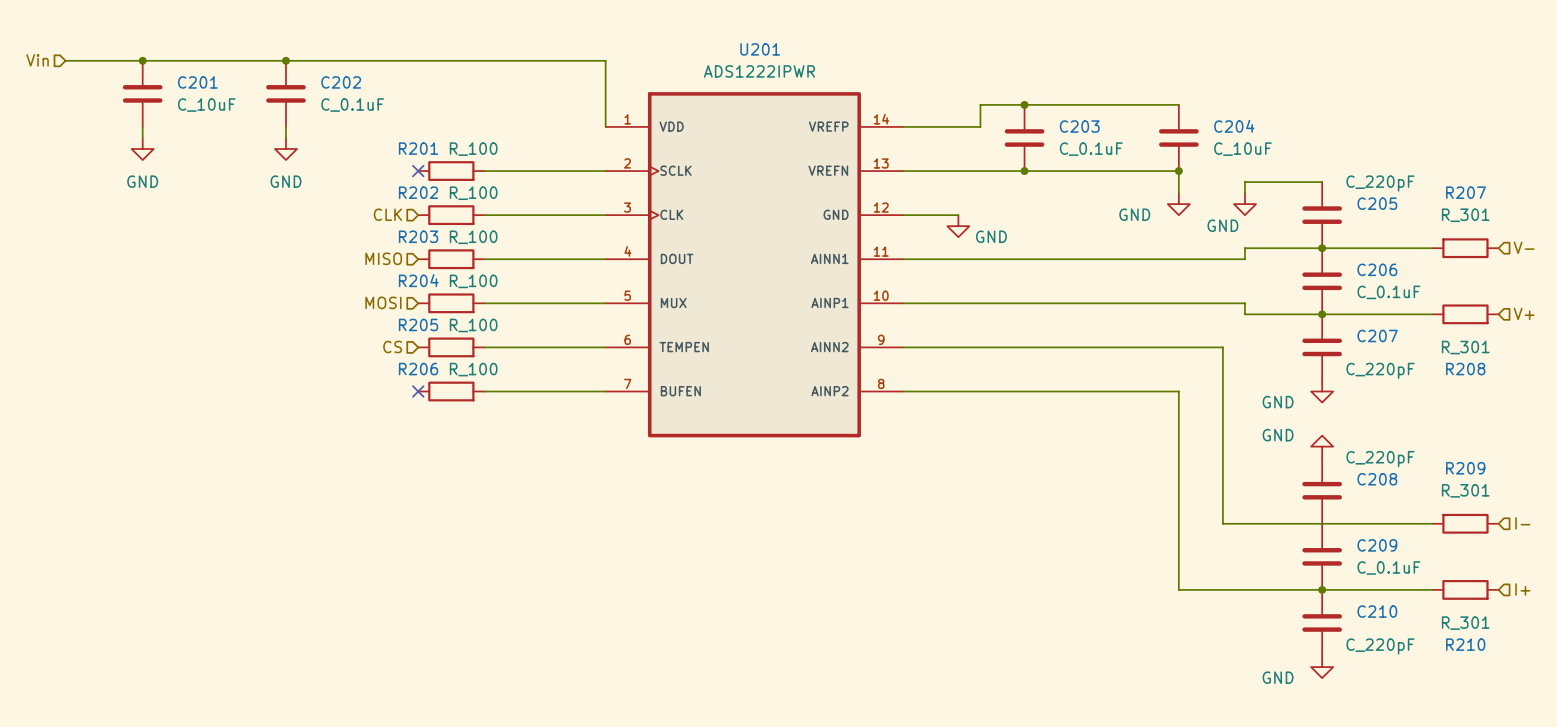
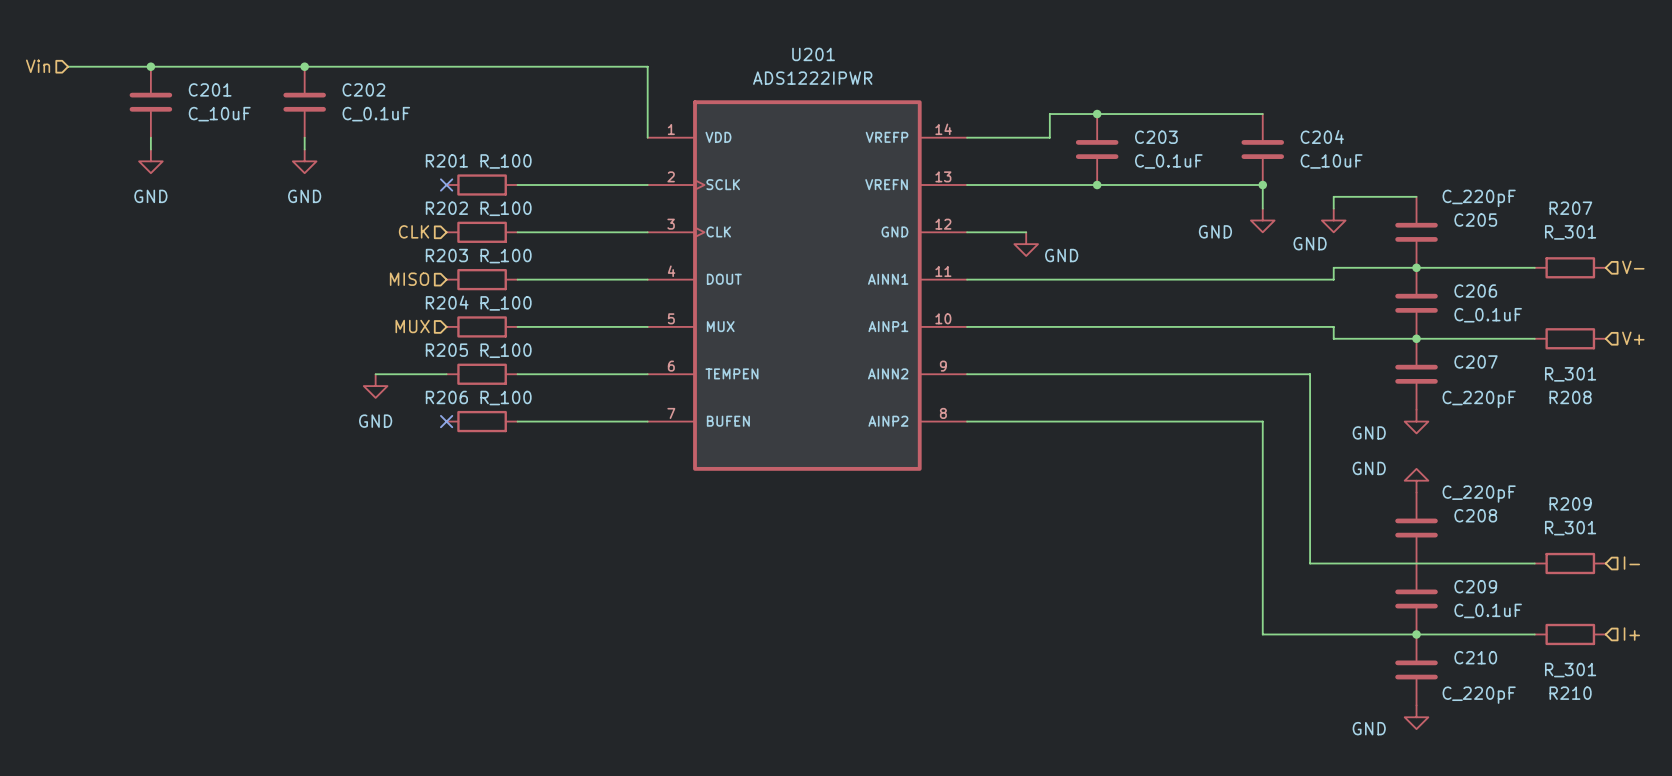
hierarchical label: MOSI (383, 302) -> MUX (412, 326)
wire: none -> (375, 374) (446, 374)
hierarchical label: CS (392, 347) -> none
power symbol: none -> GND (375, 386)

